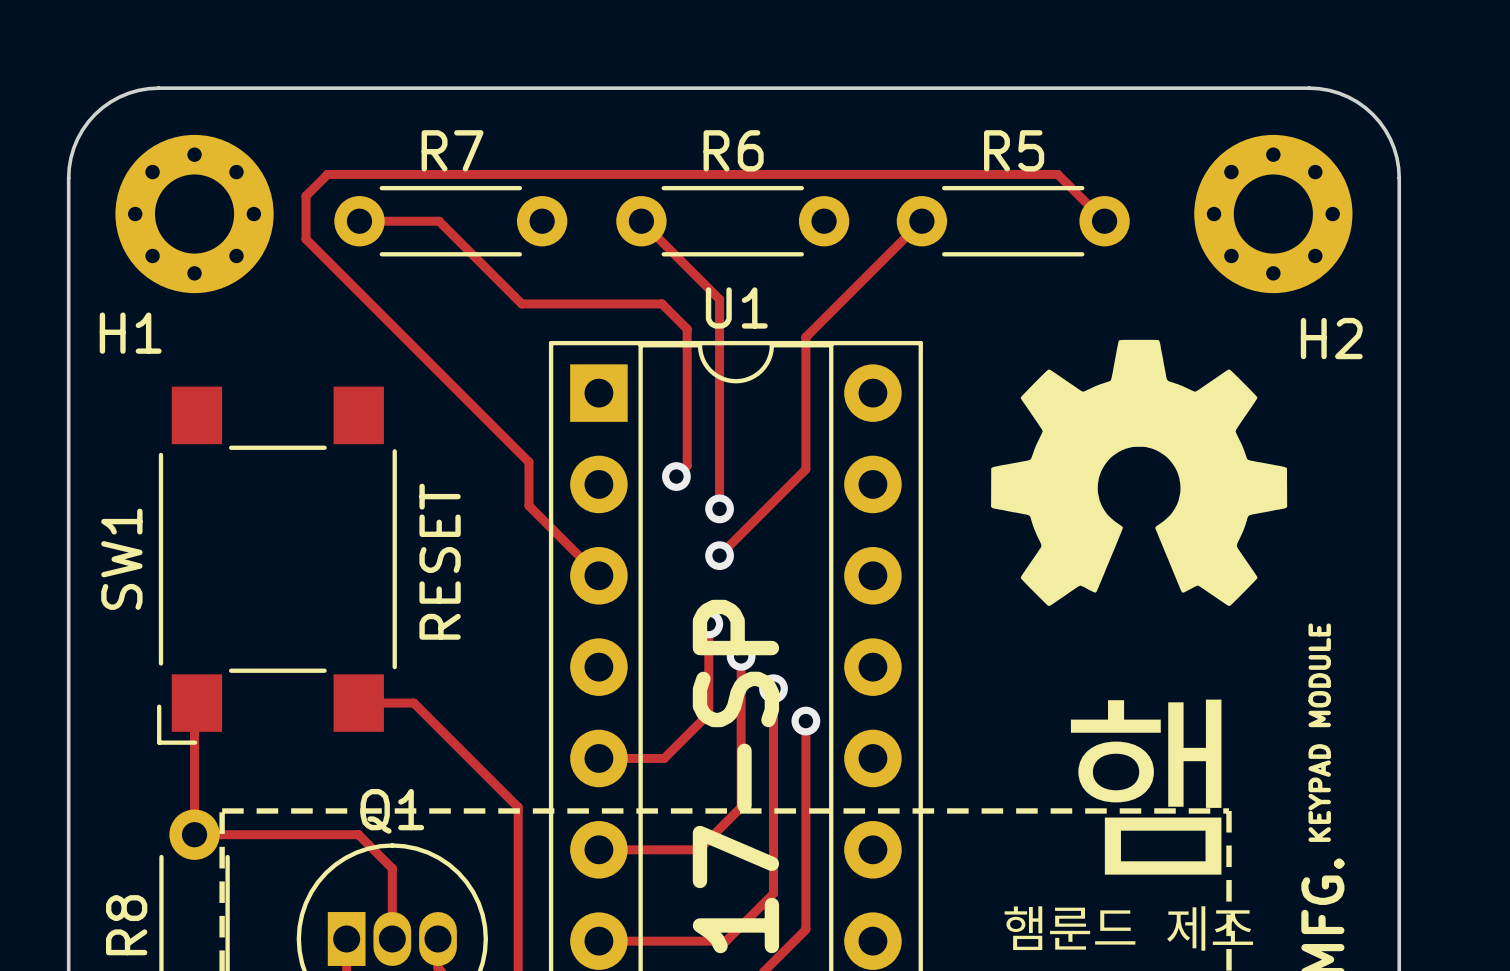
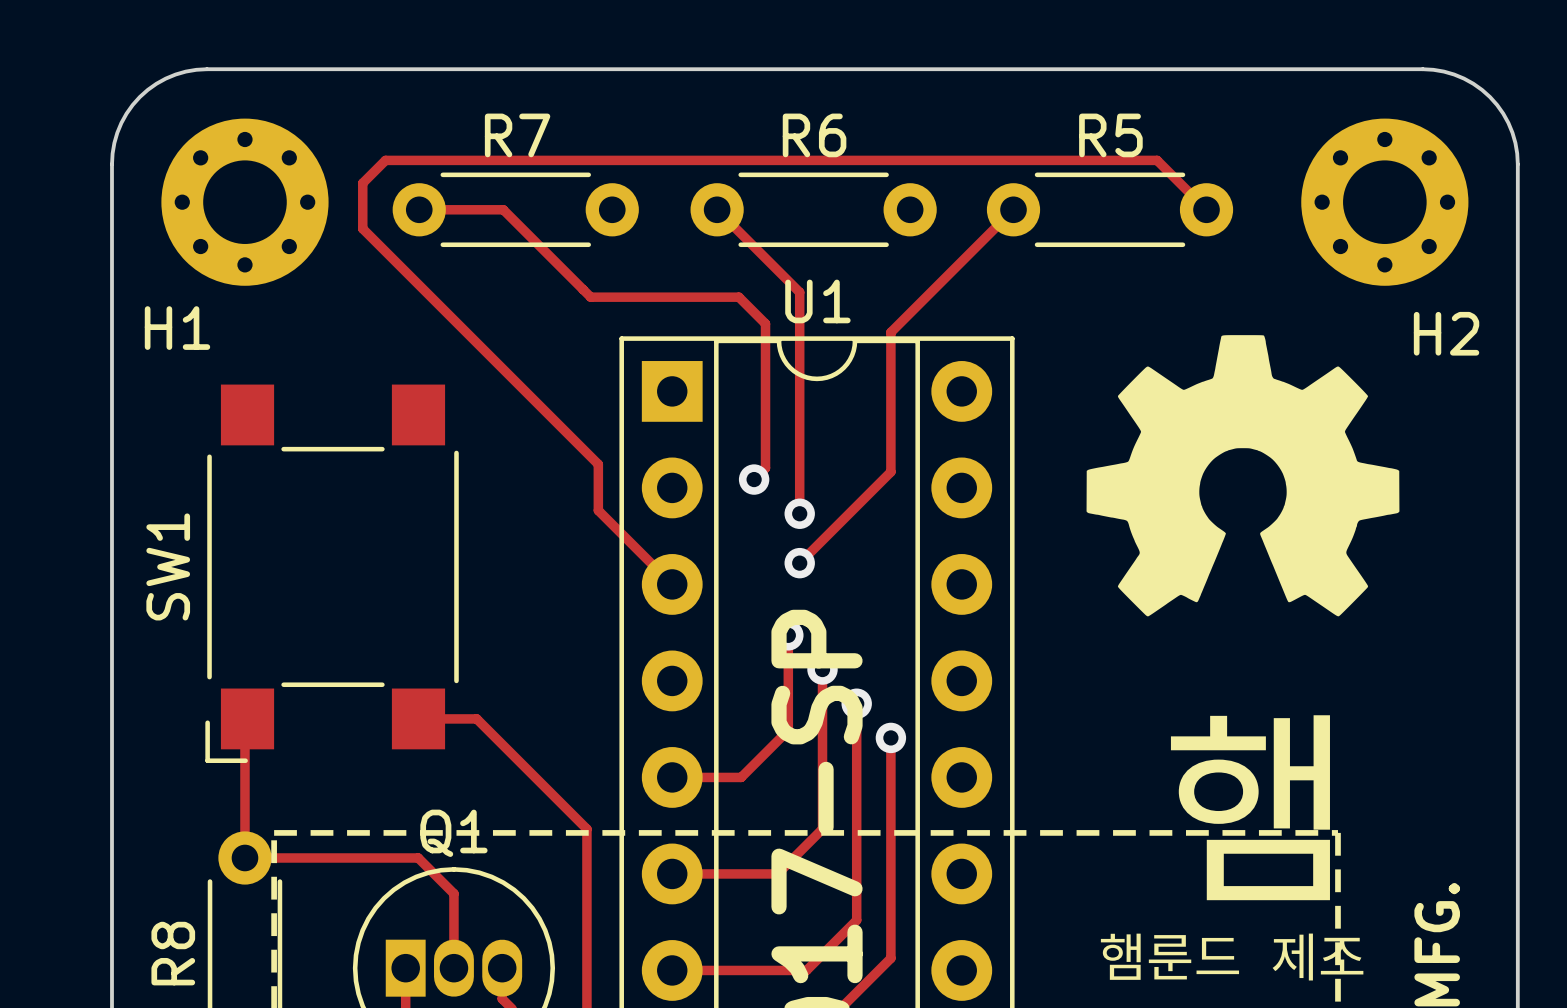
text: RESET (440, 561) -> none
text: KEYPAD MODULE (1319, 732) -> none

